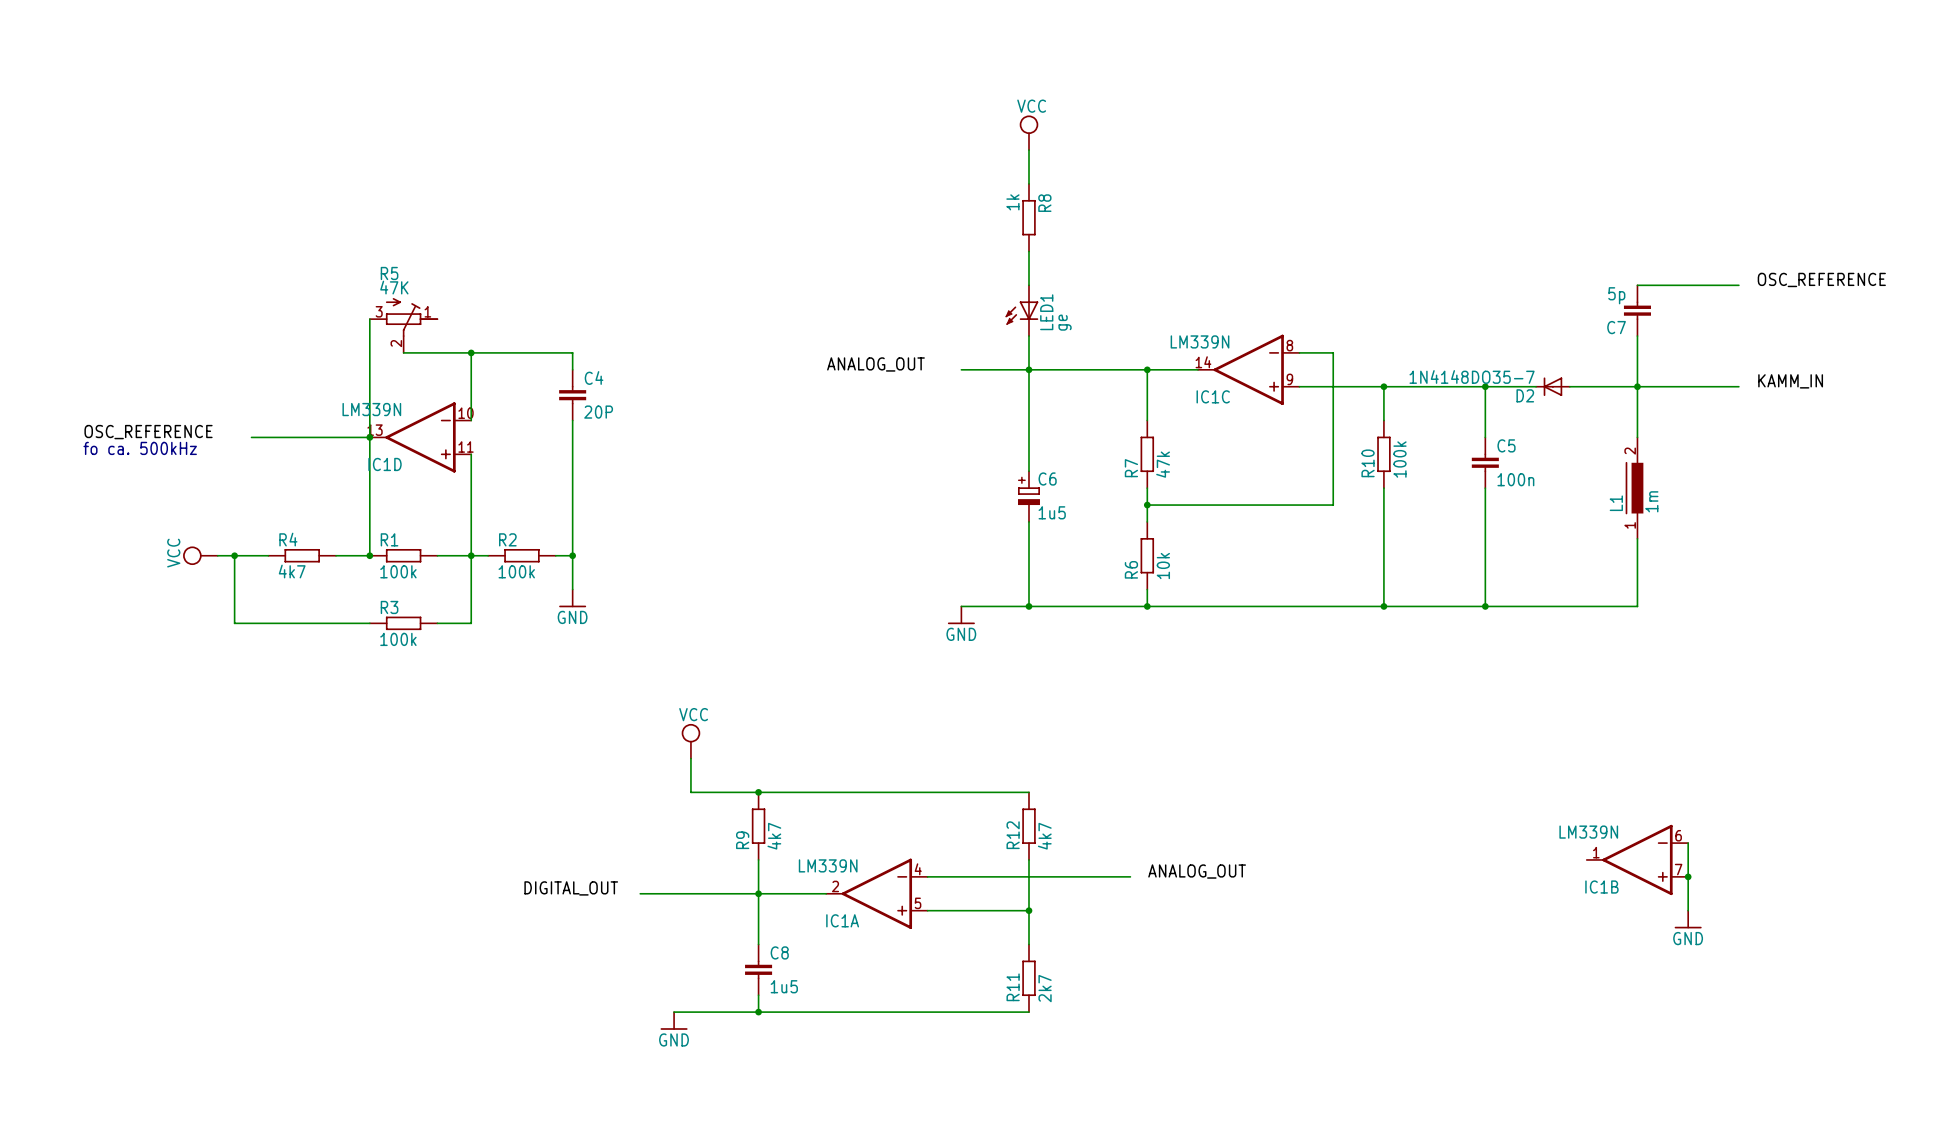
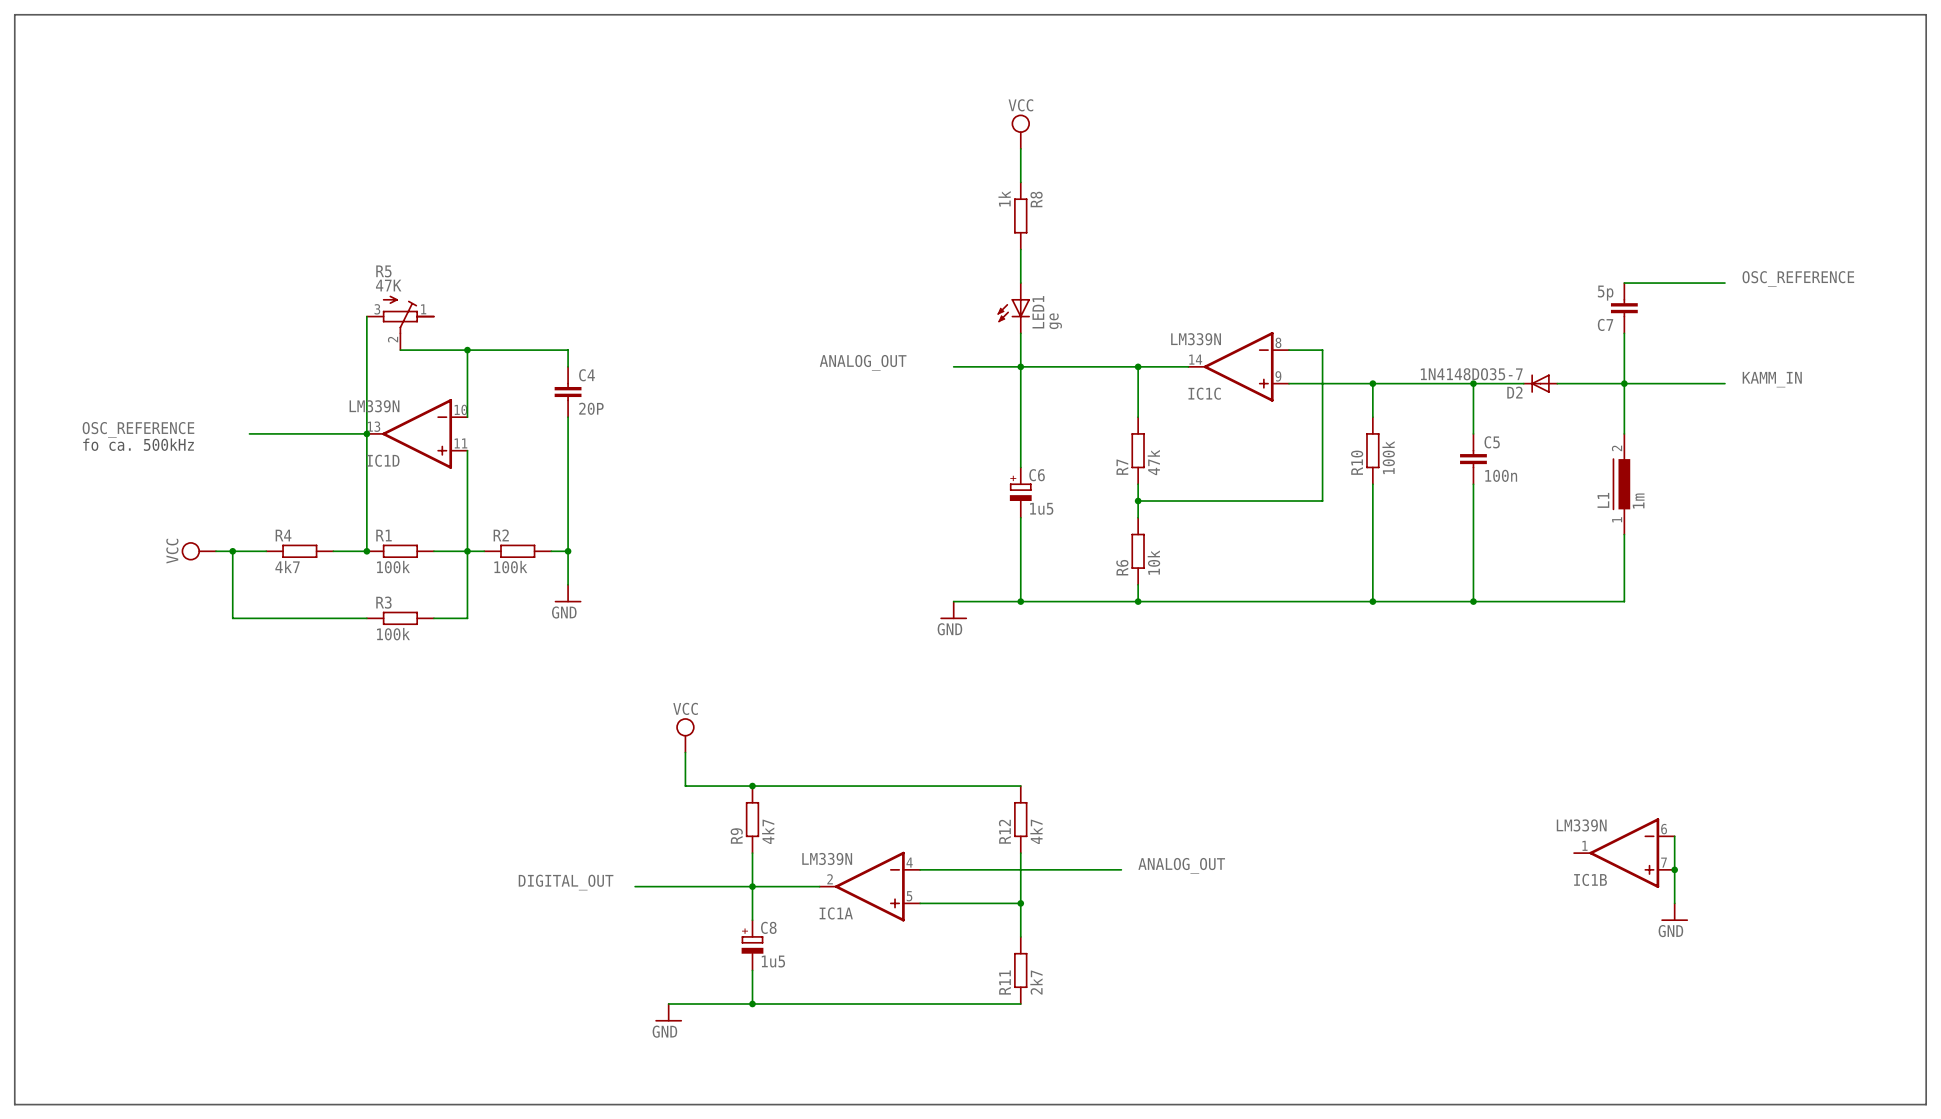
line: none -> (14, 14) (1926, 14) (1926, 1104) (14, 1104) (14, 14)
C8 symbol: [745, 944, 773, 996] -> [741, 920, 764, 971]

